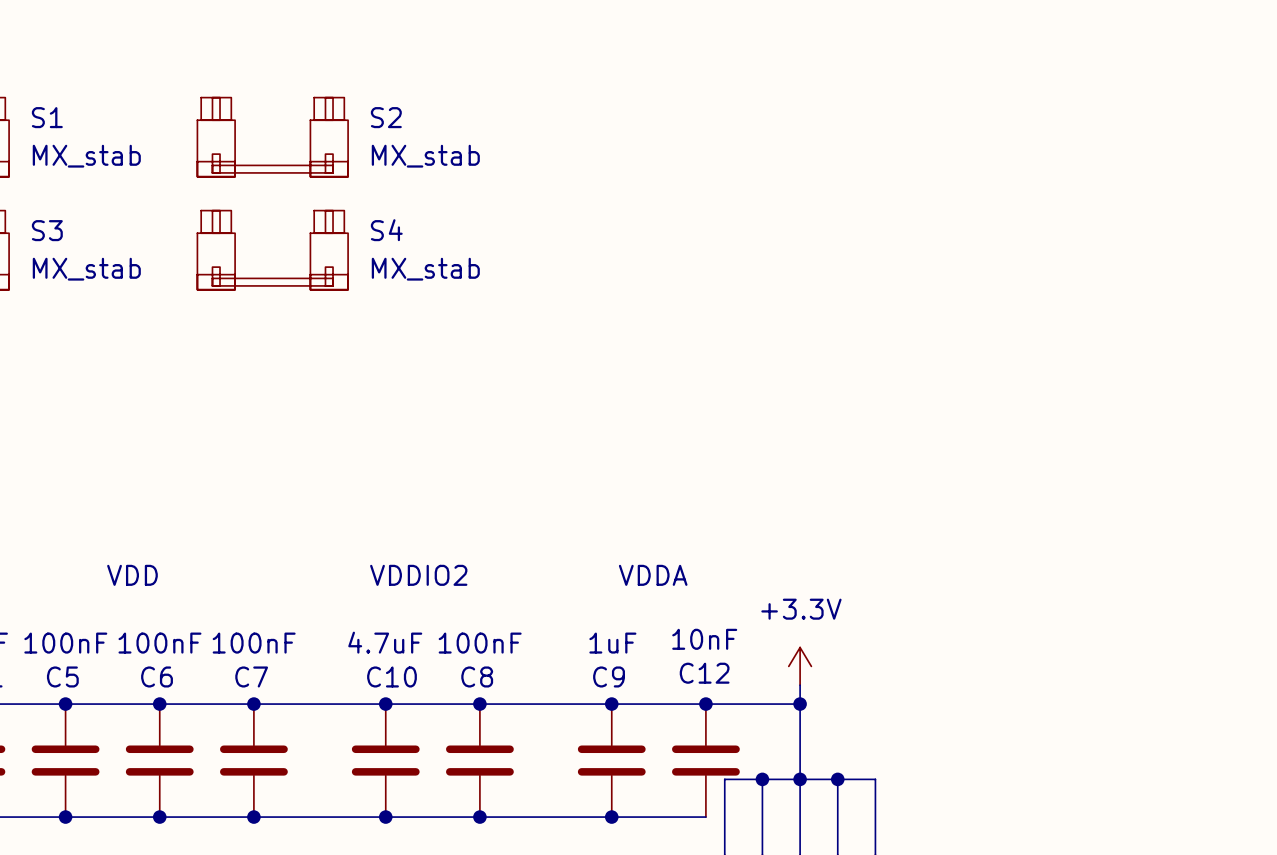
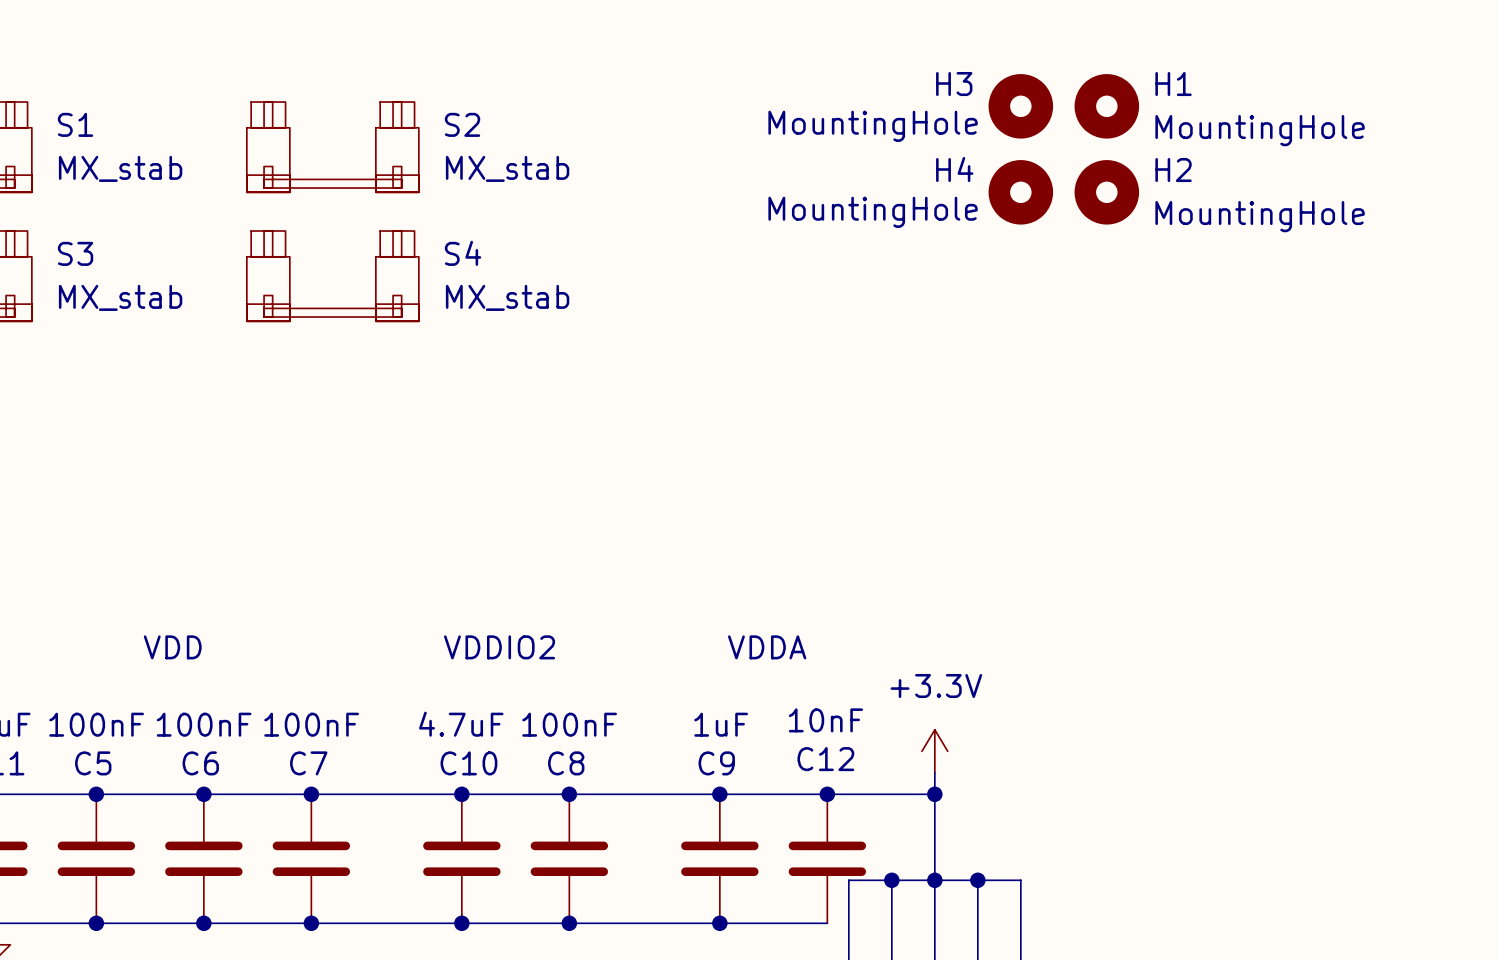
H3: none -> MountingHole (1020, 106)
H1: none -> MountingHole (1106, 106)
H4: none -> MountingHole (1020, 192)
H2: none -> MountingHole (1106, 192)

